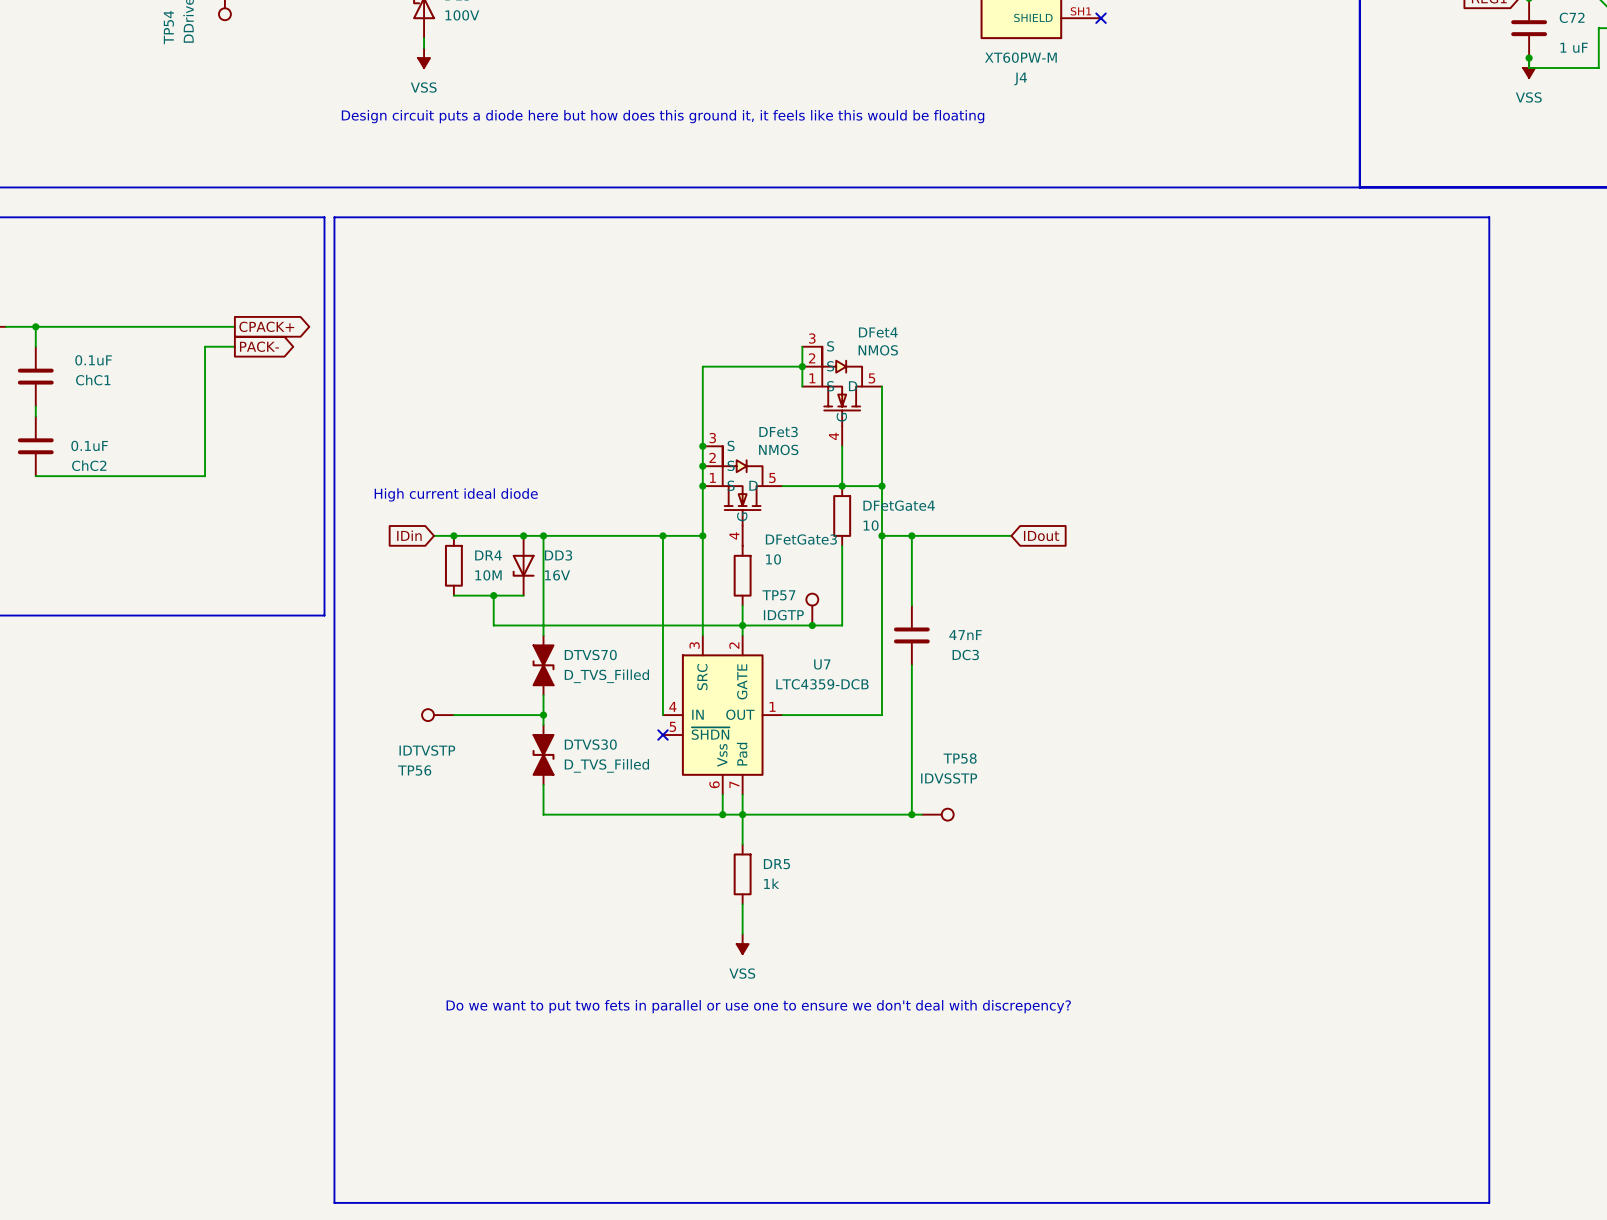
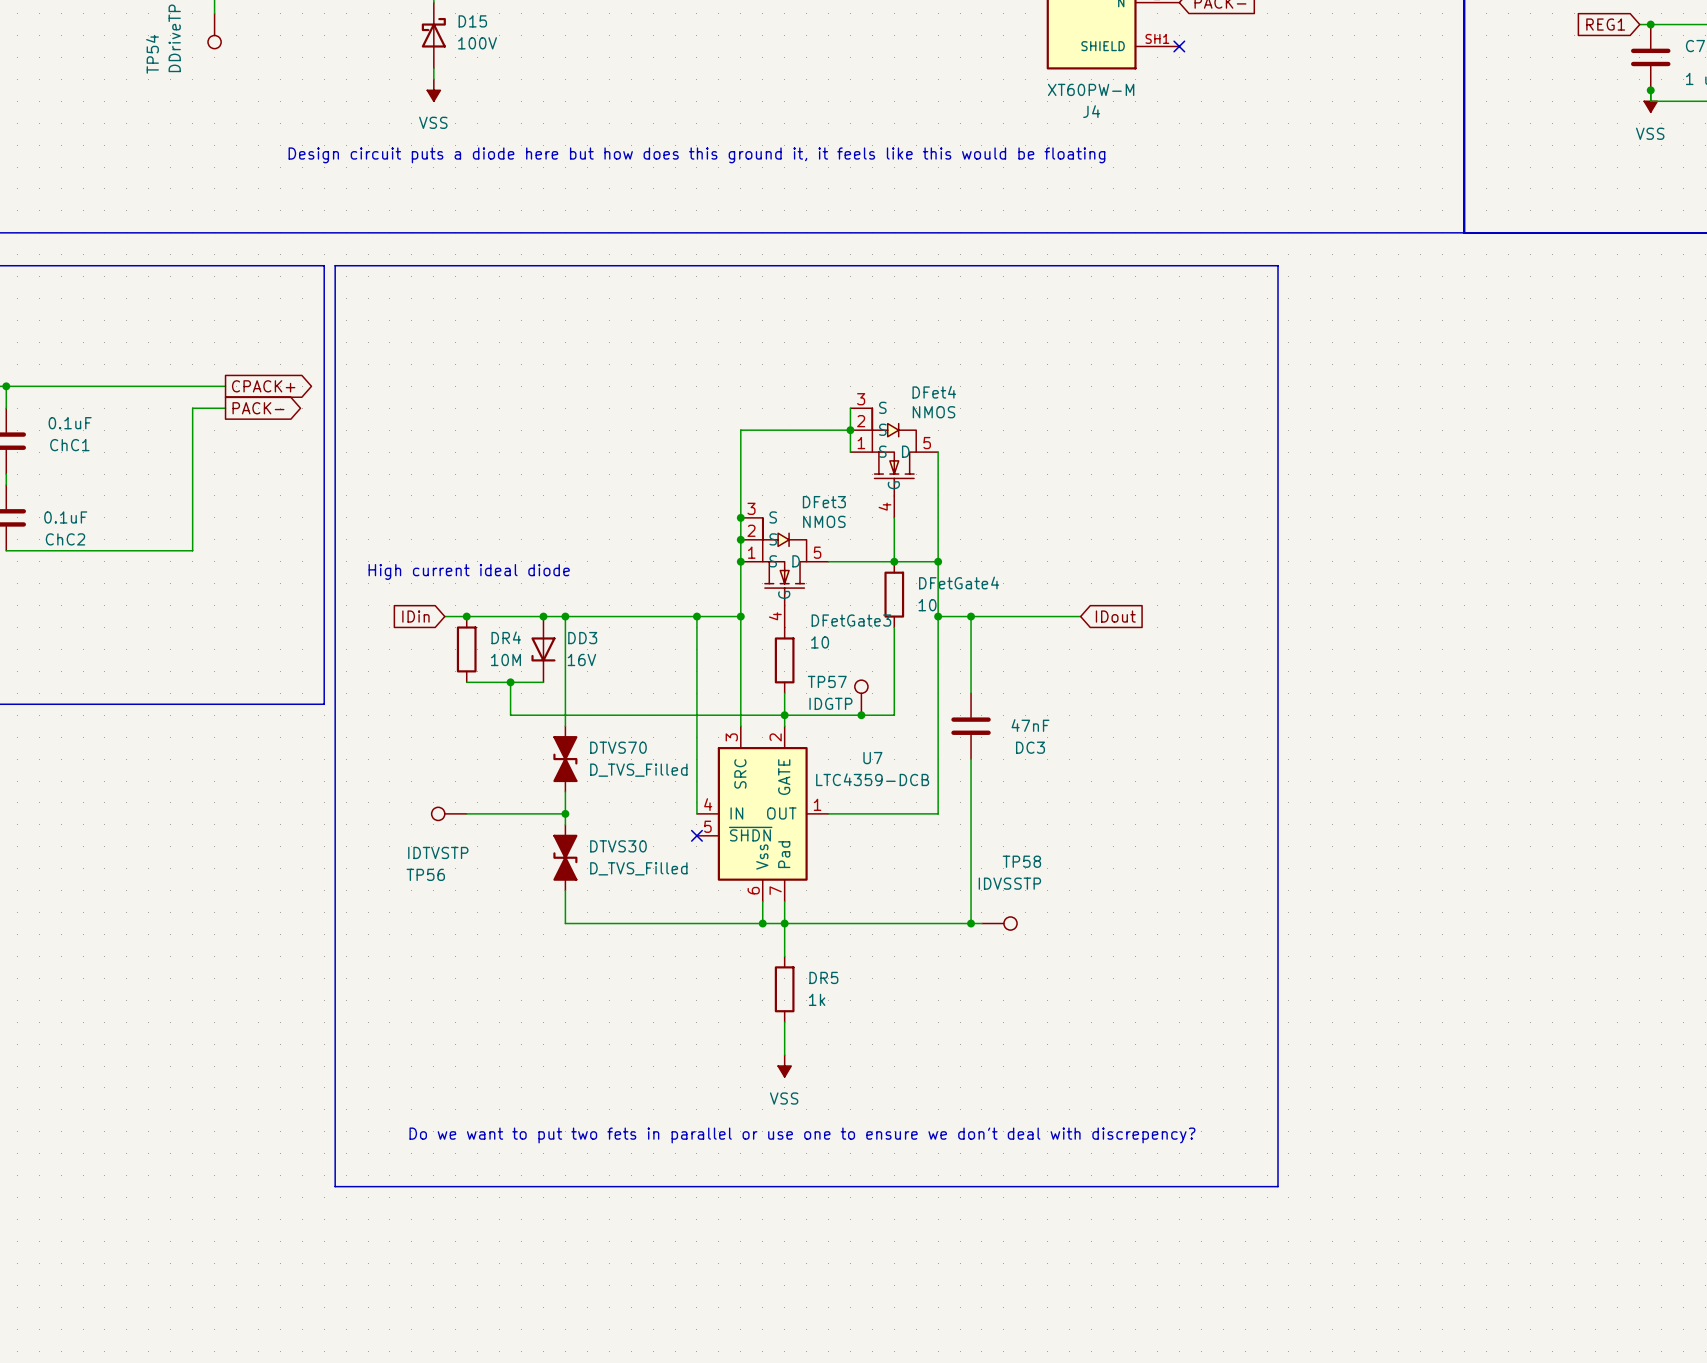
line: (1190, 217) (1489, 217) (1489, 1202) (334, 1202) (334, 1053) -> (1278, 265) (1278, 1186) (335, 1186)

